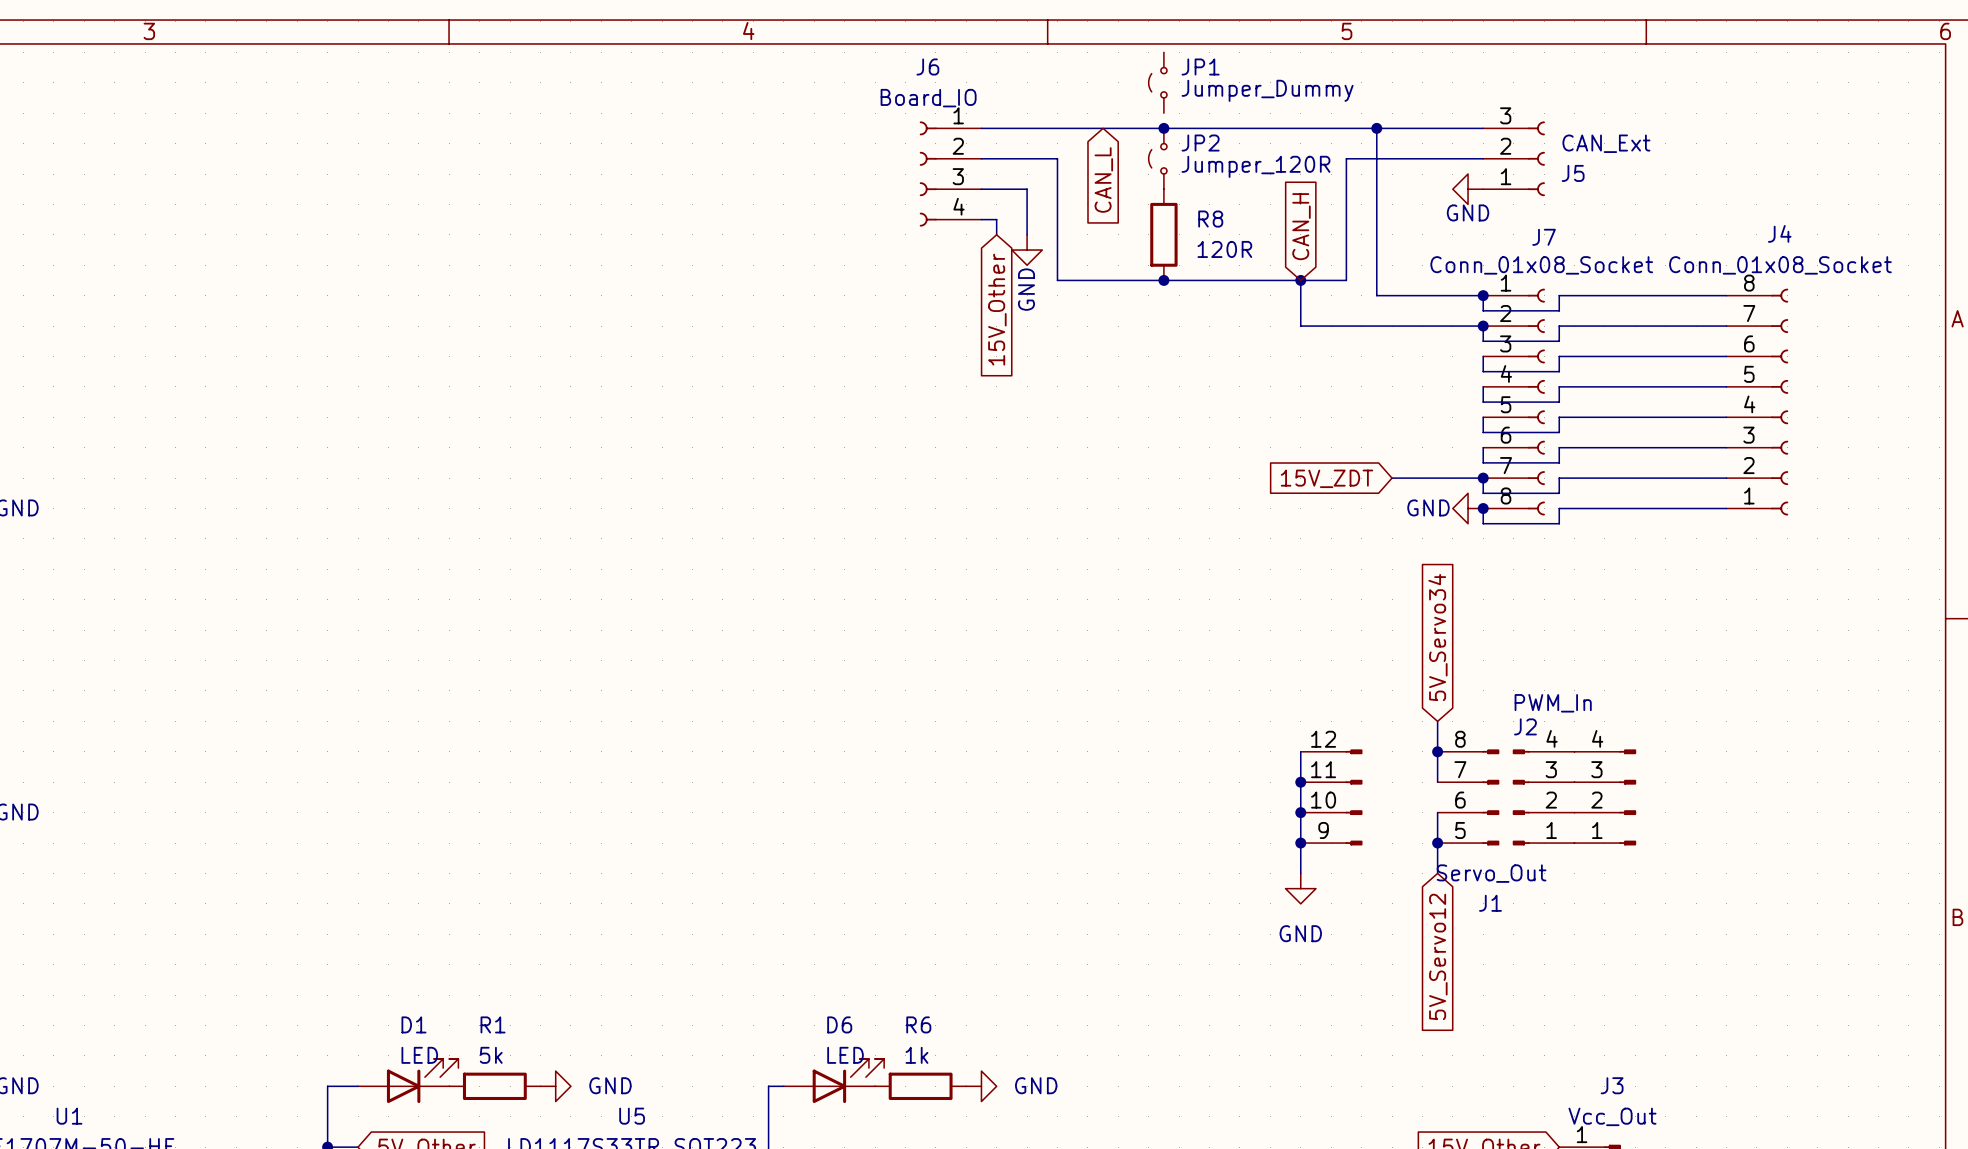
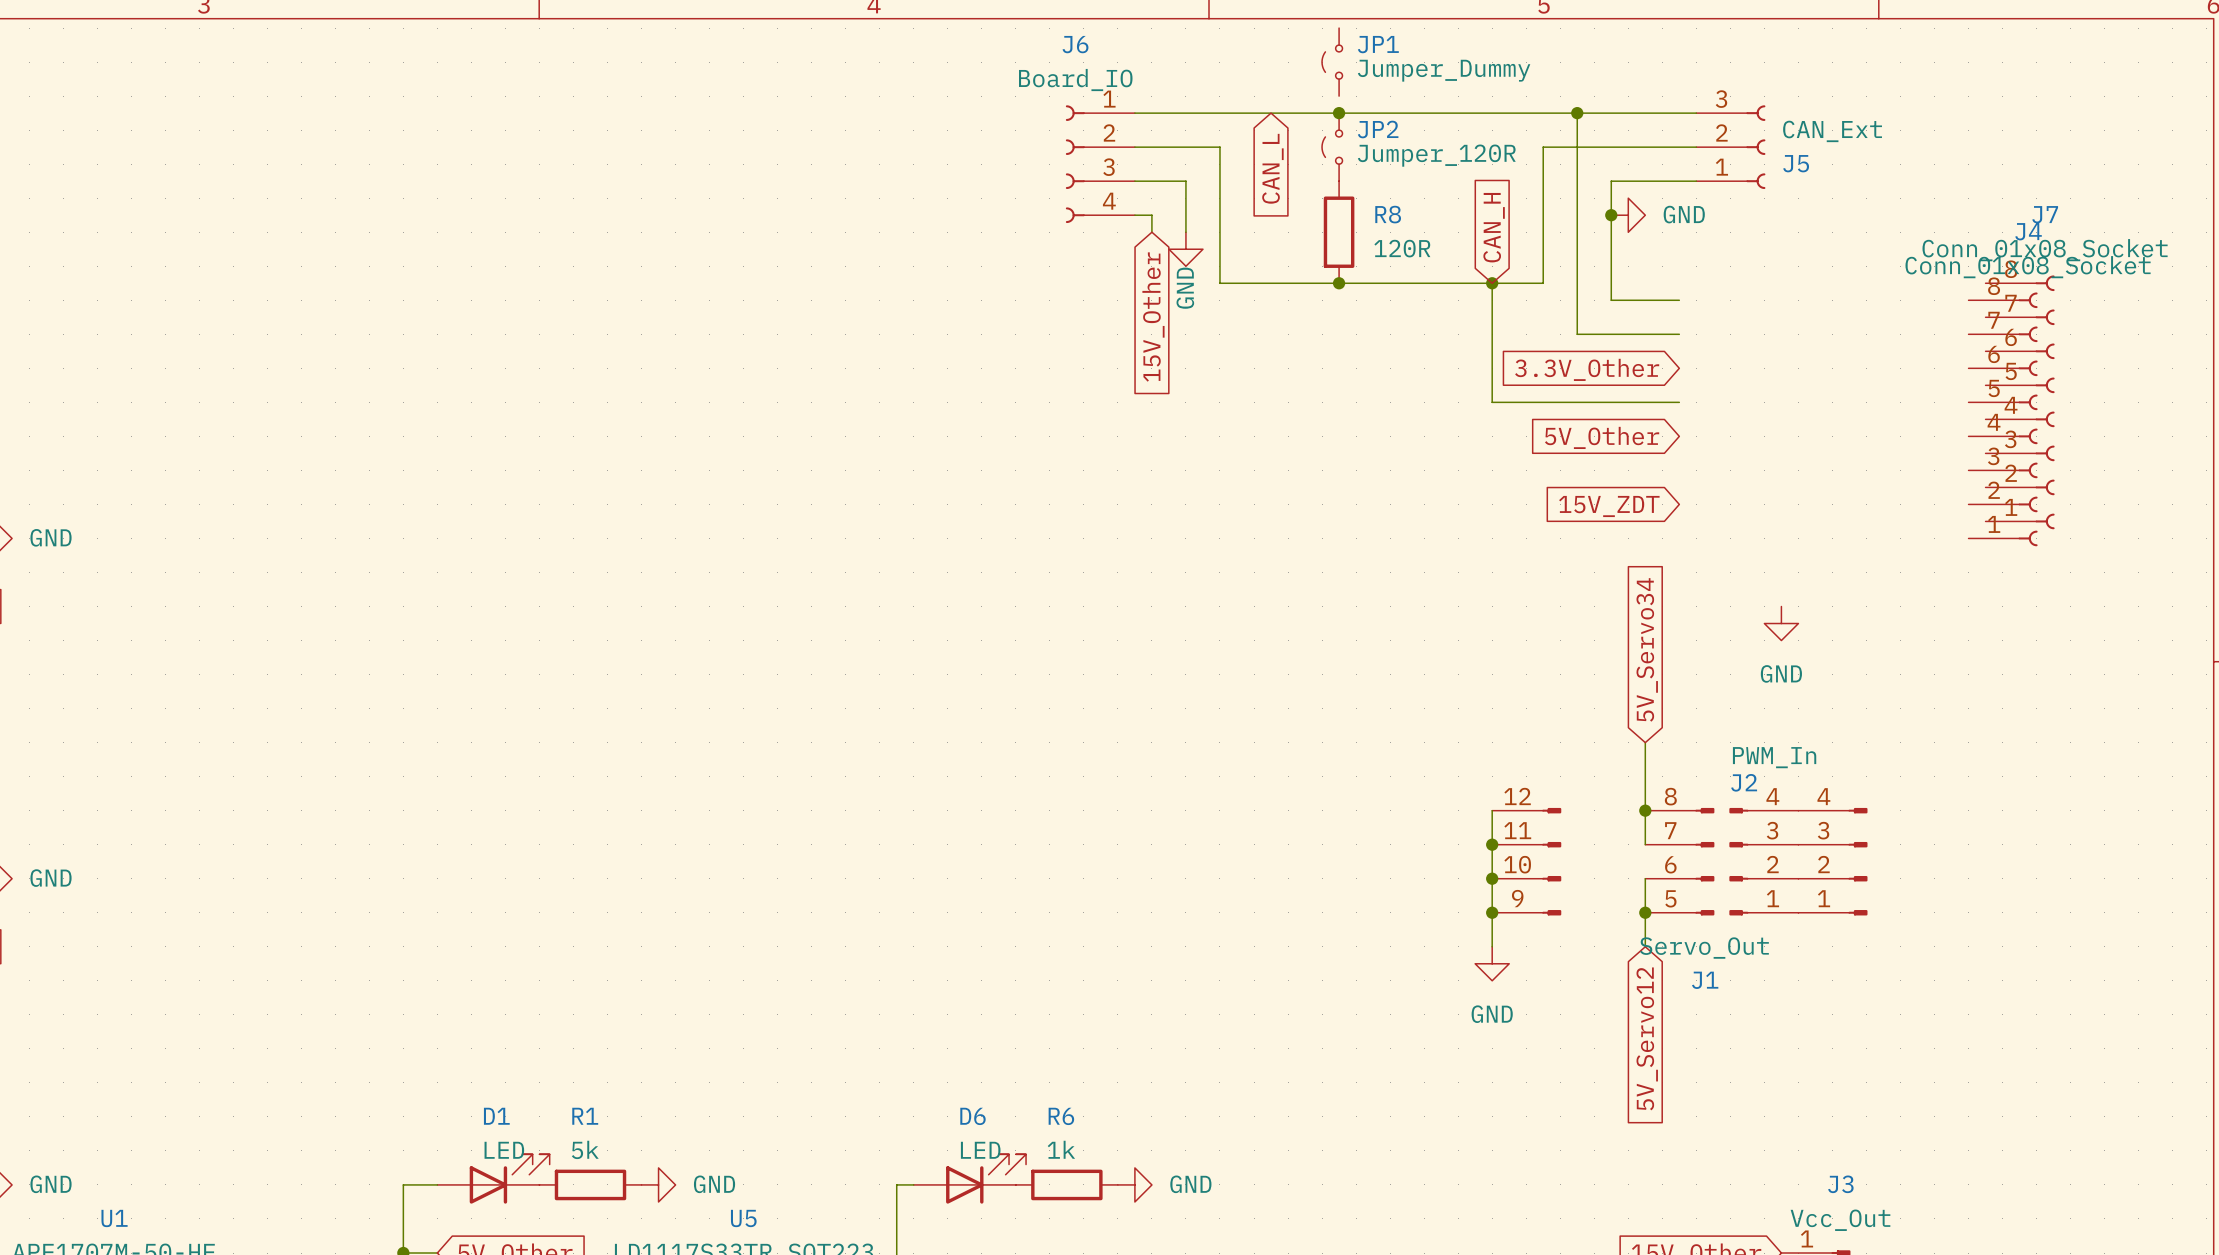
power symbol rotation: 0° (1468, 189) -> 180° (1628, 215)
power symbol position: GND (1468, 189) -> GND (1628, 215)
wire: none -> (1696, 181) (1611, 181) (1611, 300)
power symbol text position: GND (1468, 212) -> GND (1684, 214)
junction: none -> (1611, 215)
wire: (1376, 295) (1407, 295) -> (1577, 300) (1577, 334)
wire: (1468, 295) (1483, 295) (1483, 310) (1559, 310) (1559, 295) (1726, 295) -> none
junction: (1483, 295) -> none
wire: (1300, 326) (1376, 326) -> (1492, 334) (1492, 402) (1679, 402)
wire: (1468, 326) (1483, 326) (1483, 341) (1559, 341) (1559, 326) (1726, 326) -> none
junction: (1483, 326) -> none
wire: (1483, 356) (1483, 371) (1559, 371) (1559, 356) (1726, 356) -> none
global label: none -> 3.3V_Other (1587, 369)
wire: (1483, 386) (1483, 402) (1559, 402) (1559, 386) (1726, 386) -> none
J7 position: (1514, 402) -> (2020, 402)
J7 flip: as is (1536, 402) -> up-down (2045, 402)
wire: (1483, 417) (1483, 432) (1559, 432) (1559, 417) (1726, 417) -> none
global label: none -> 5V_Other (1602, 437)
wire: (1483, 447) (1483, 462) (1559, 462) (1559, 447) (1726, 447) -> none
global label position: 15V_ZDT (1326, 478) -> 15V_ZDT (1609, 506)
wire: (1392, 478) (1483, 478) (1483, 493) (1559, 493) (1559, 478) (1726, 478) -> none
junction: (1483, 478) -> none
power symbol rotation: 0° (1468, 508) -> 90° counterclockwise (1781, 623)
power symbol position: GND (1468, 508) -> GND (1781, 623)
wire: (1483, 508) (1483, 523) (1559, 523) (1559, 508) (1726, 508) -> none
junction: (1483, 508) -> none
global label position: 5V_Servo34 (1437, 637) -> 5V_Servo34 (1647, 649)
wire: none -> (1645, 742) (1645, 776)

